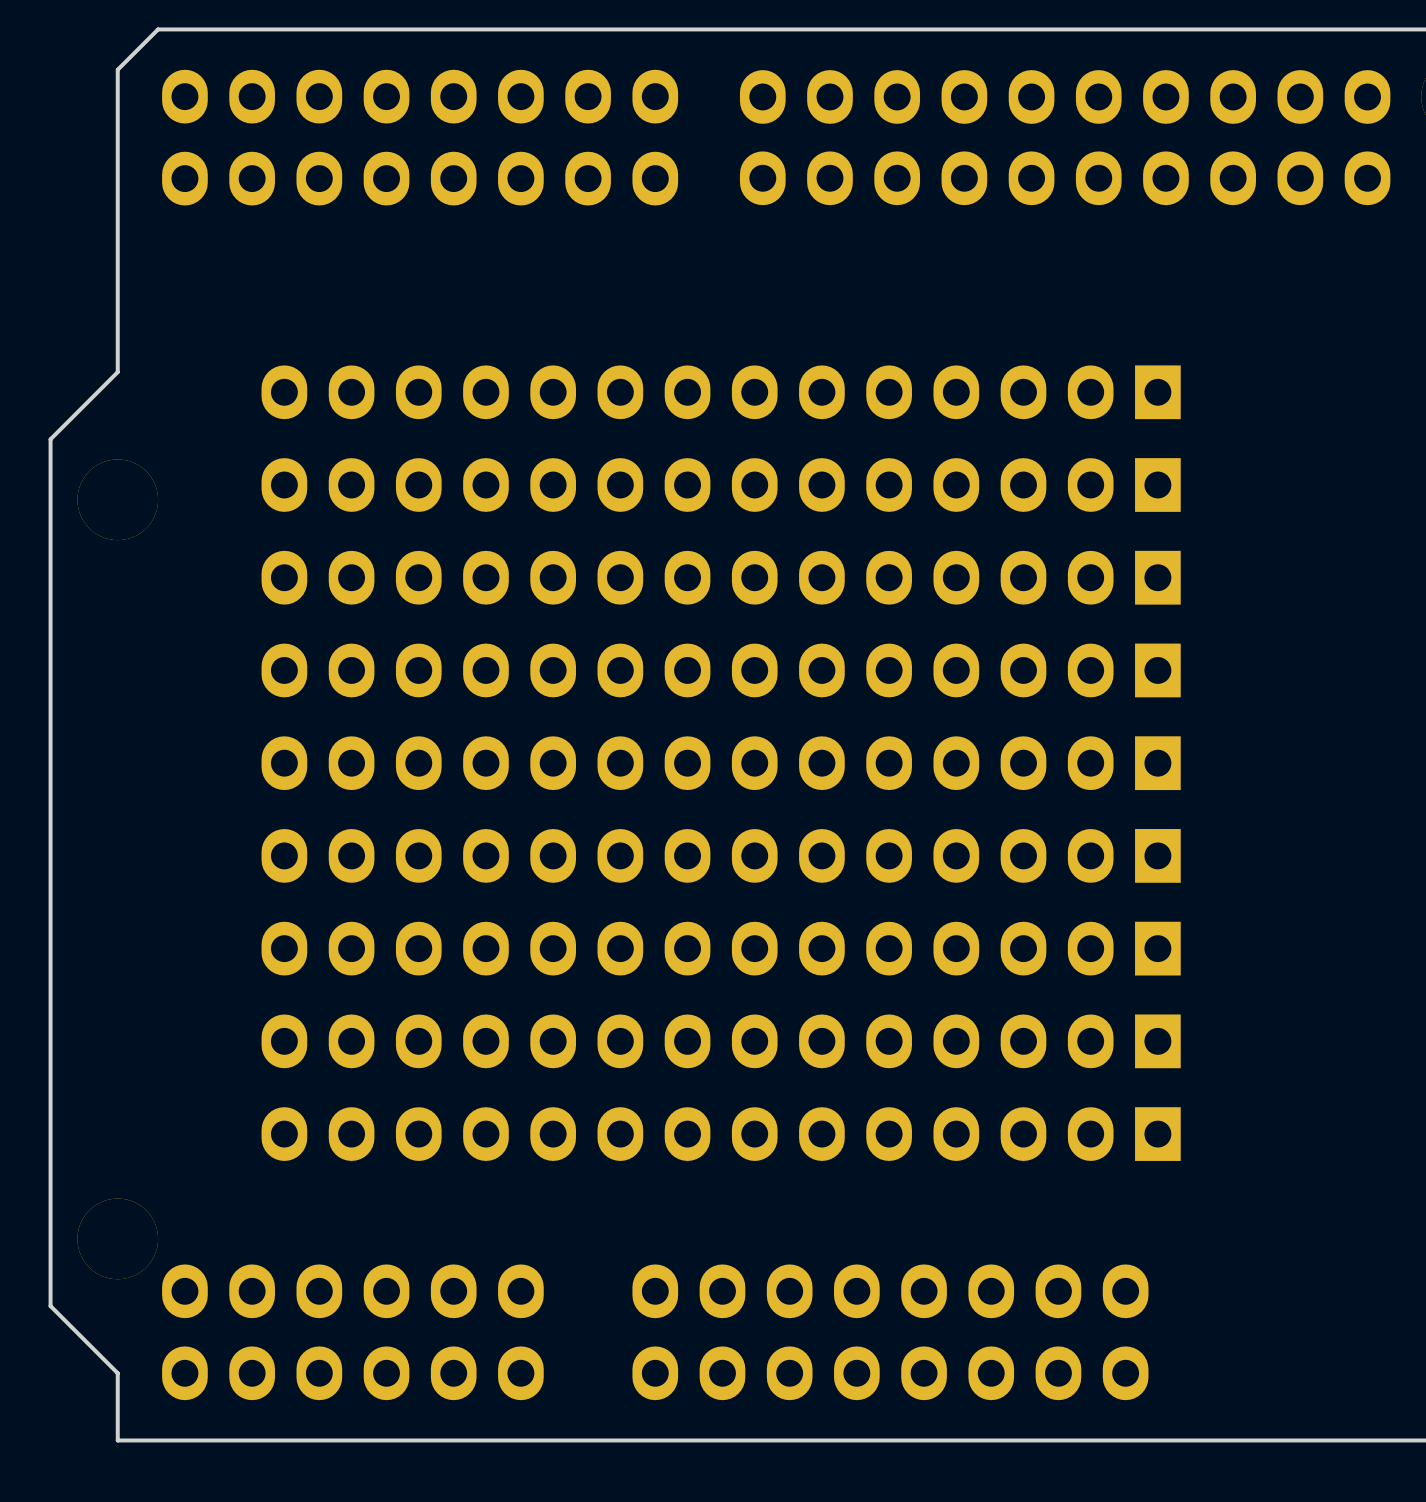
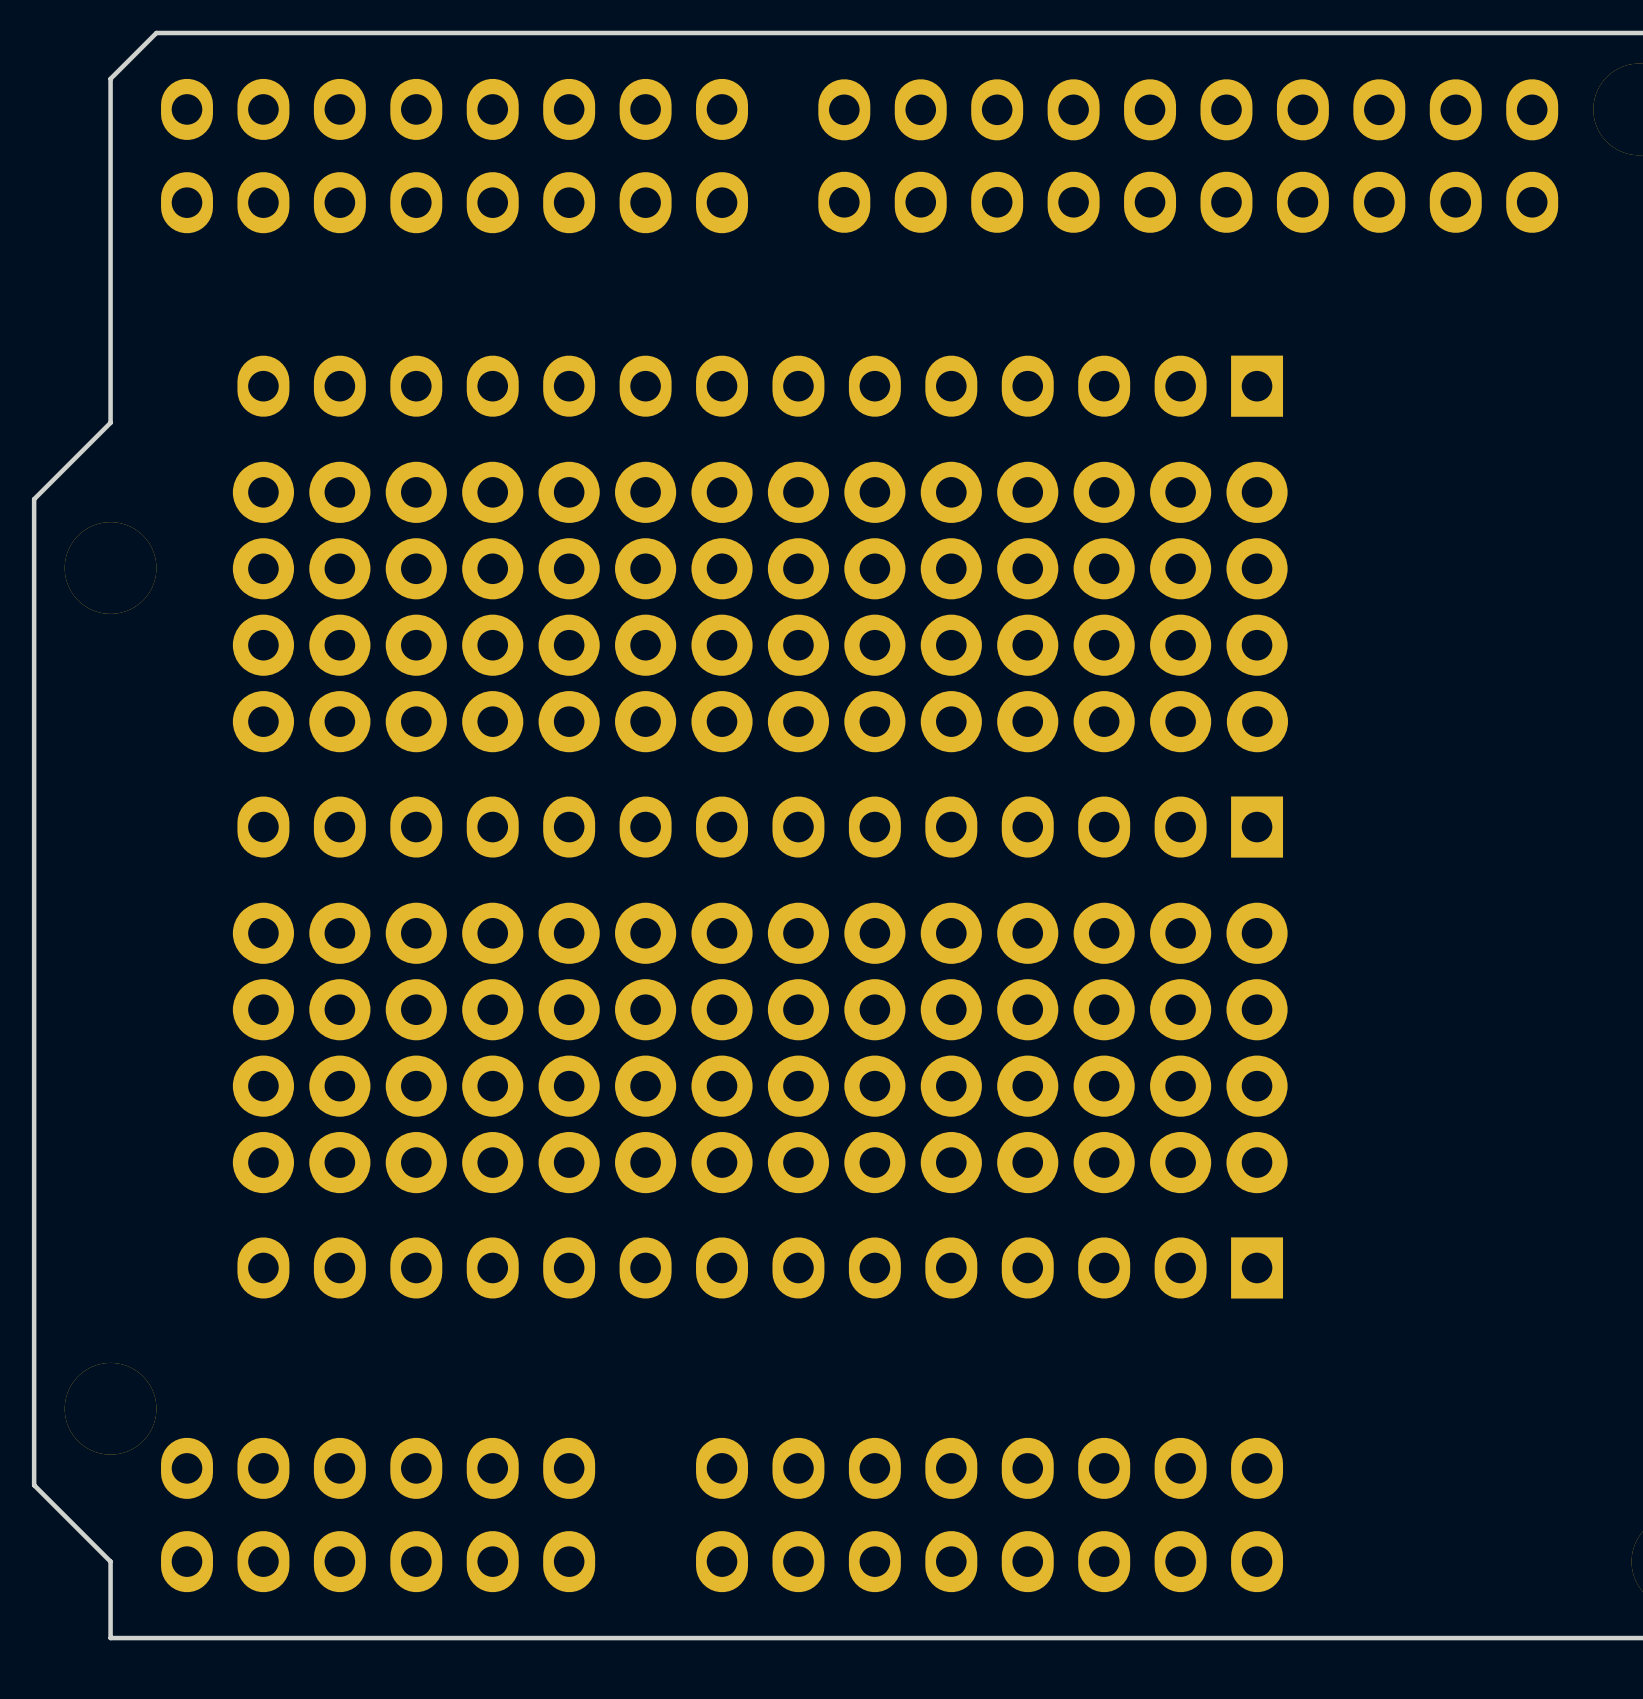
part position: (721, 392) -> (760, 386)
part: (721, 485) -> none
part: none -> (760, 607)
part: (721, 577) -> none
part: (721, 670) -> none
part: none -> (760, 827)
part: (721, 763) -> none
part: (721, 855) -> none
part: none -> (760, 1047)
part: (721, 948) -> none
part: (721, 1041) -> none
part position: (721, 1134) -> (760, 1267)

